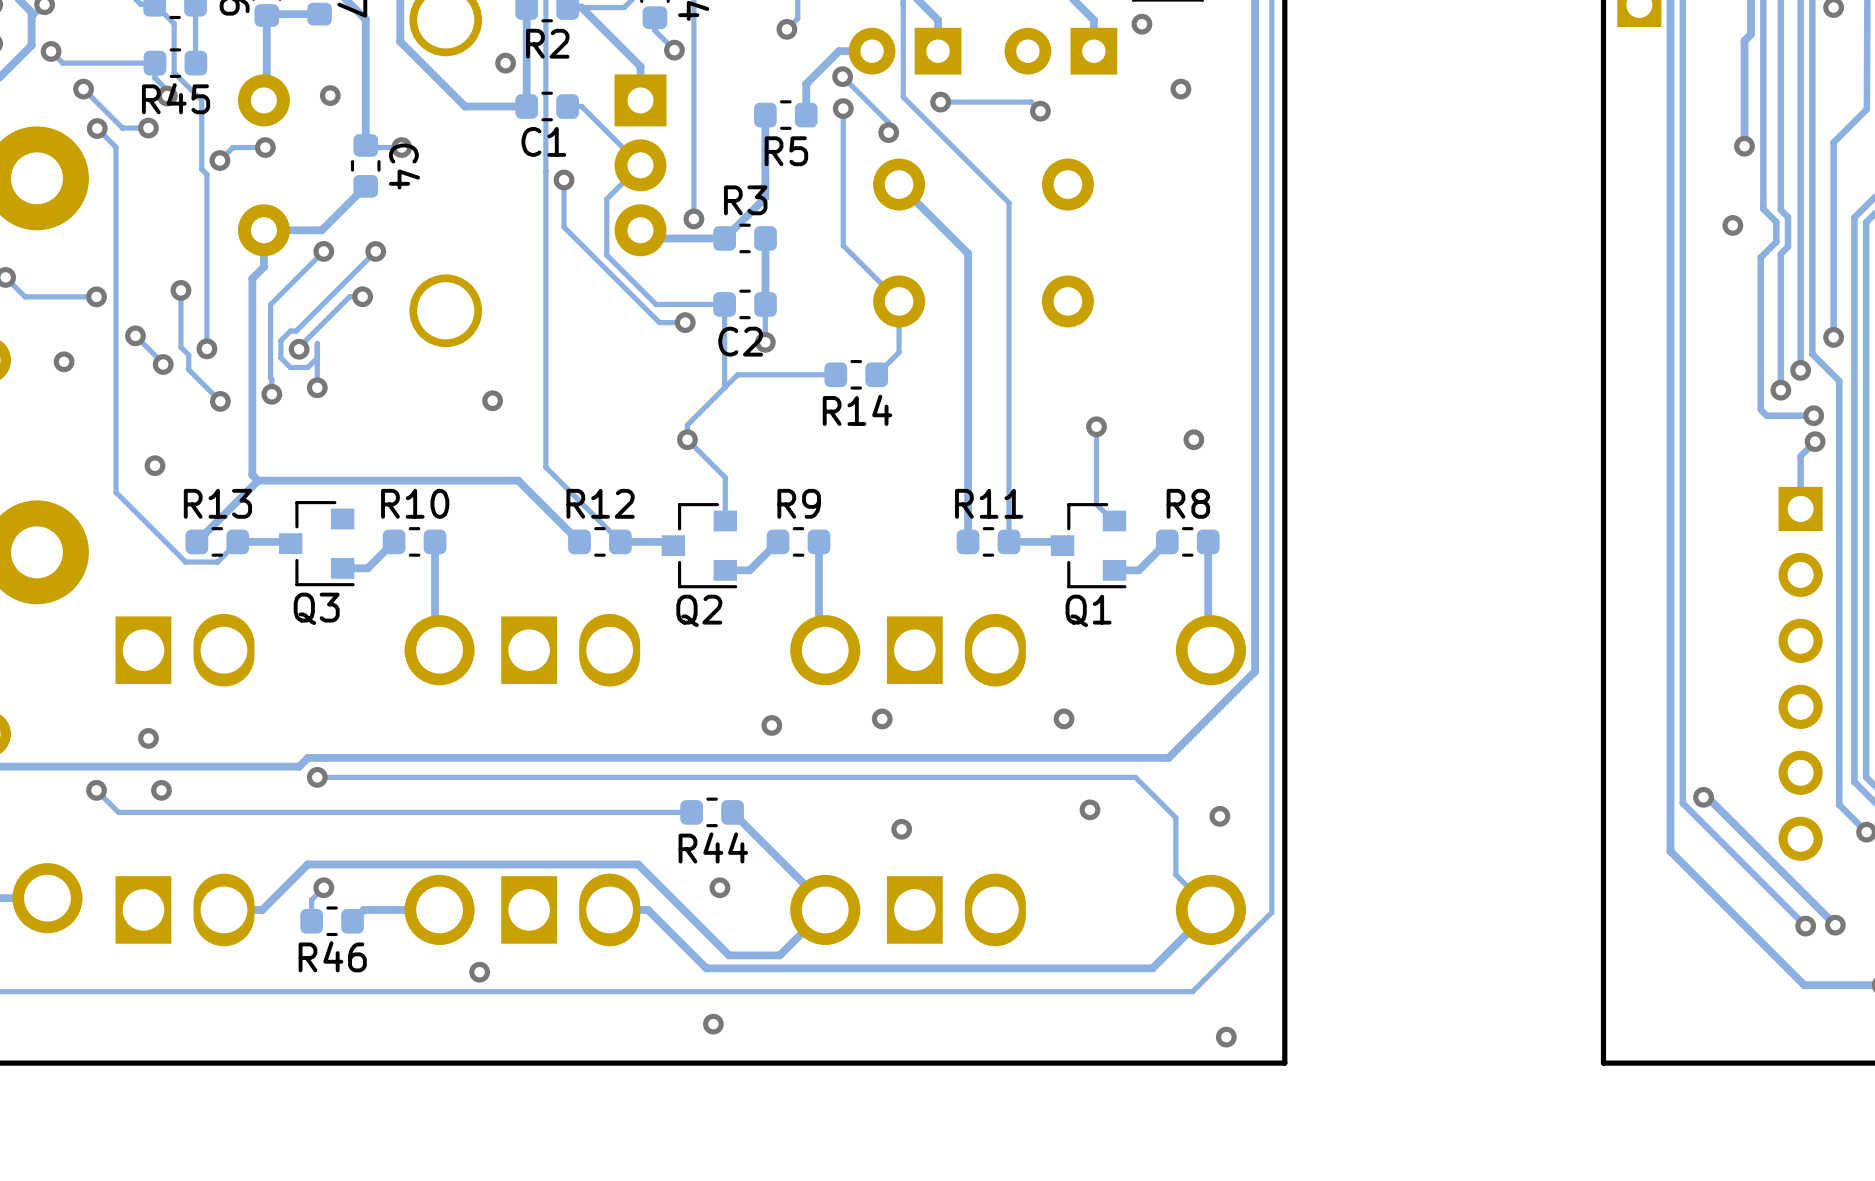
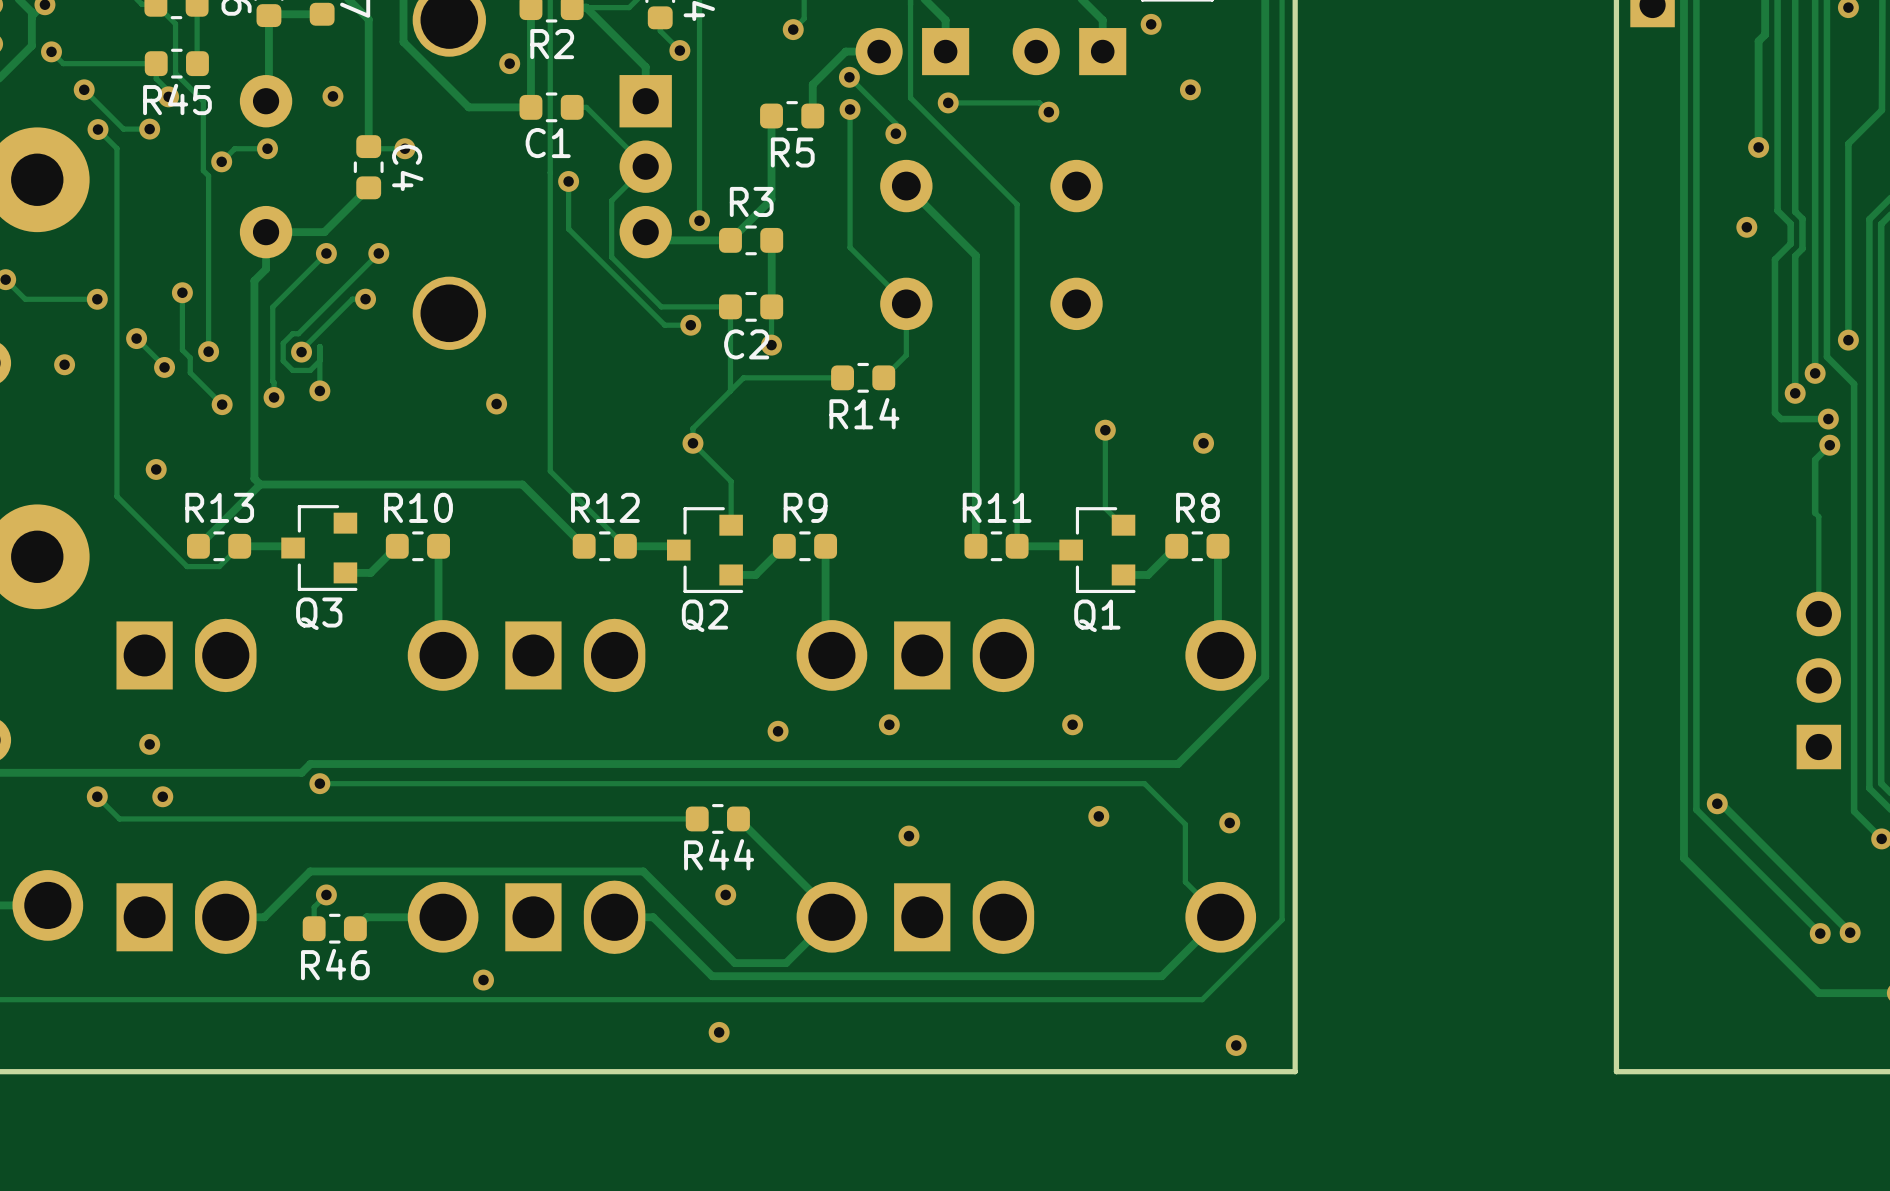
part footprint: [1778, 486, 1823, 861] -> [1796, 591, 1842, 770]
track: none -> (1815, 513) (1818, 516) (1818, 614)

